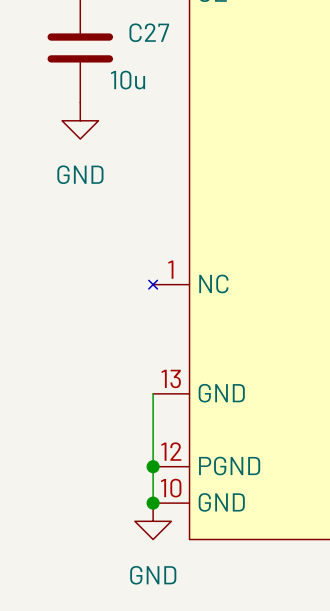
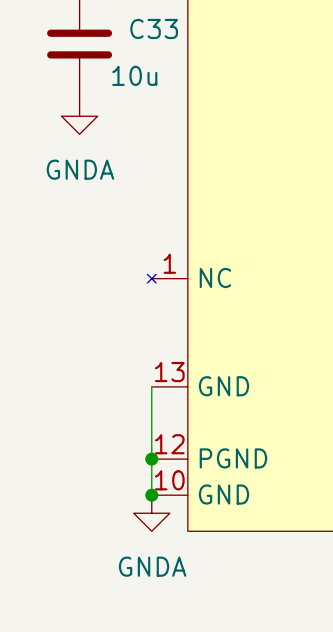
C27 name: C27 (149, 32) -> C33 (154, 28)
power symbol: GND (80, 120) -> GNDA (79, 116)
power symbol: GND (153, 521) -> GNDA (151, 513)

